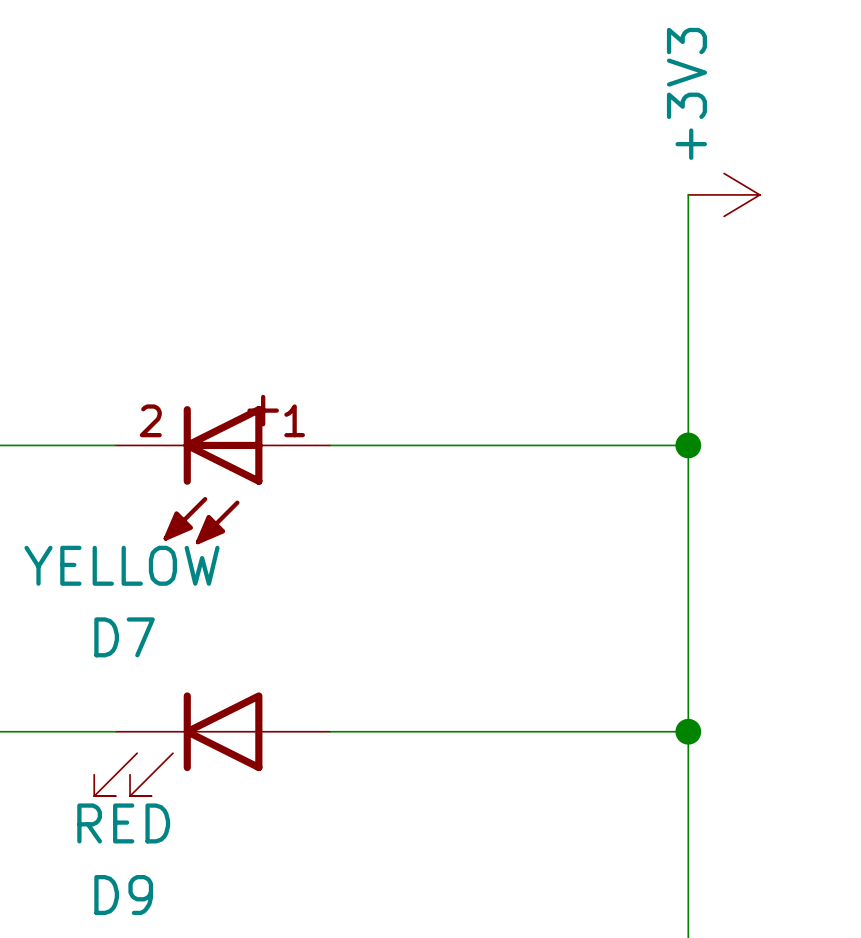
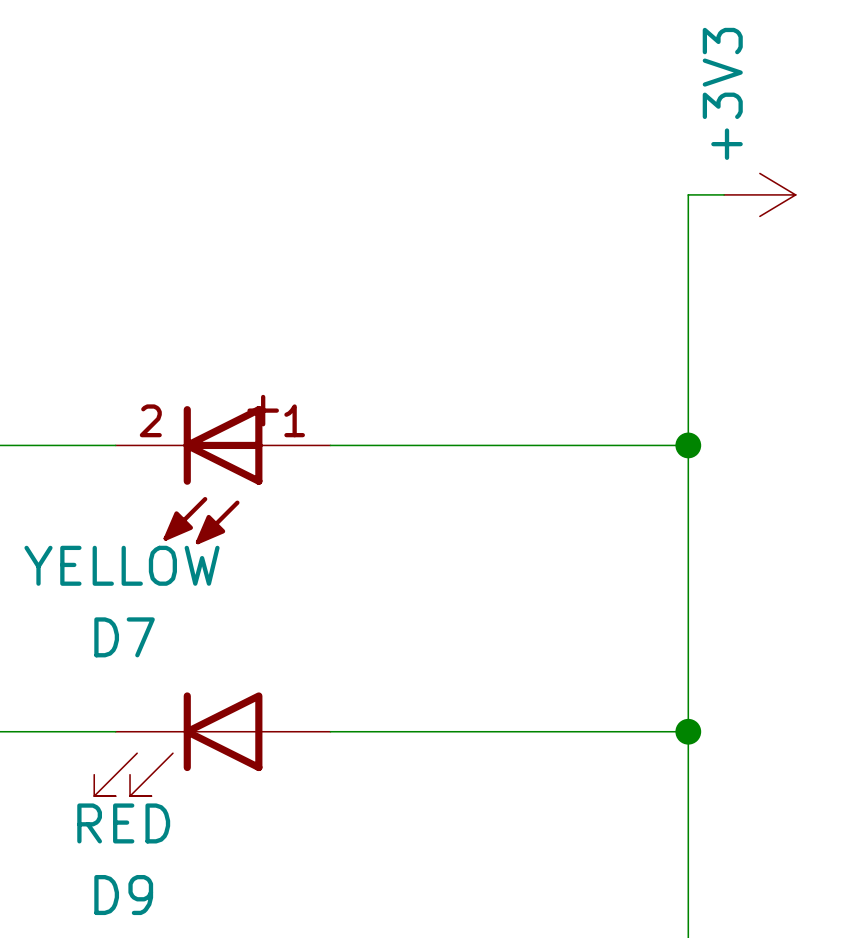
power symbol position: +3V3 (724, 194) -> +3V3 (759, 194)

